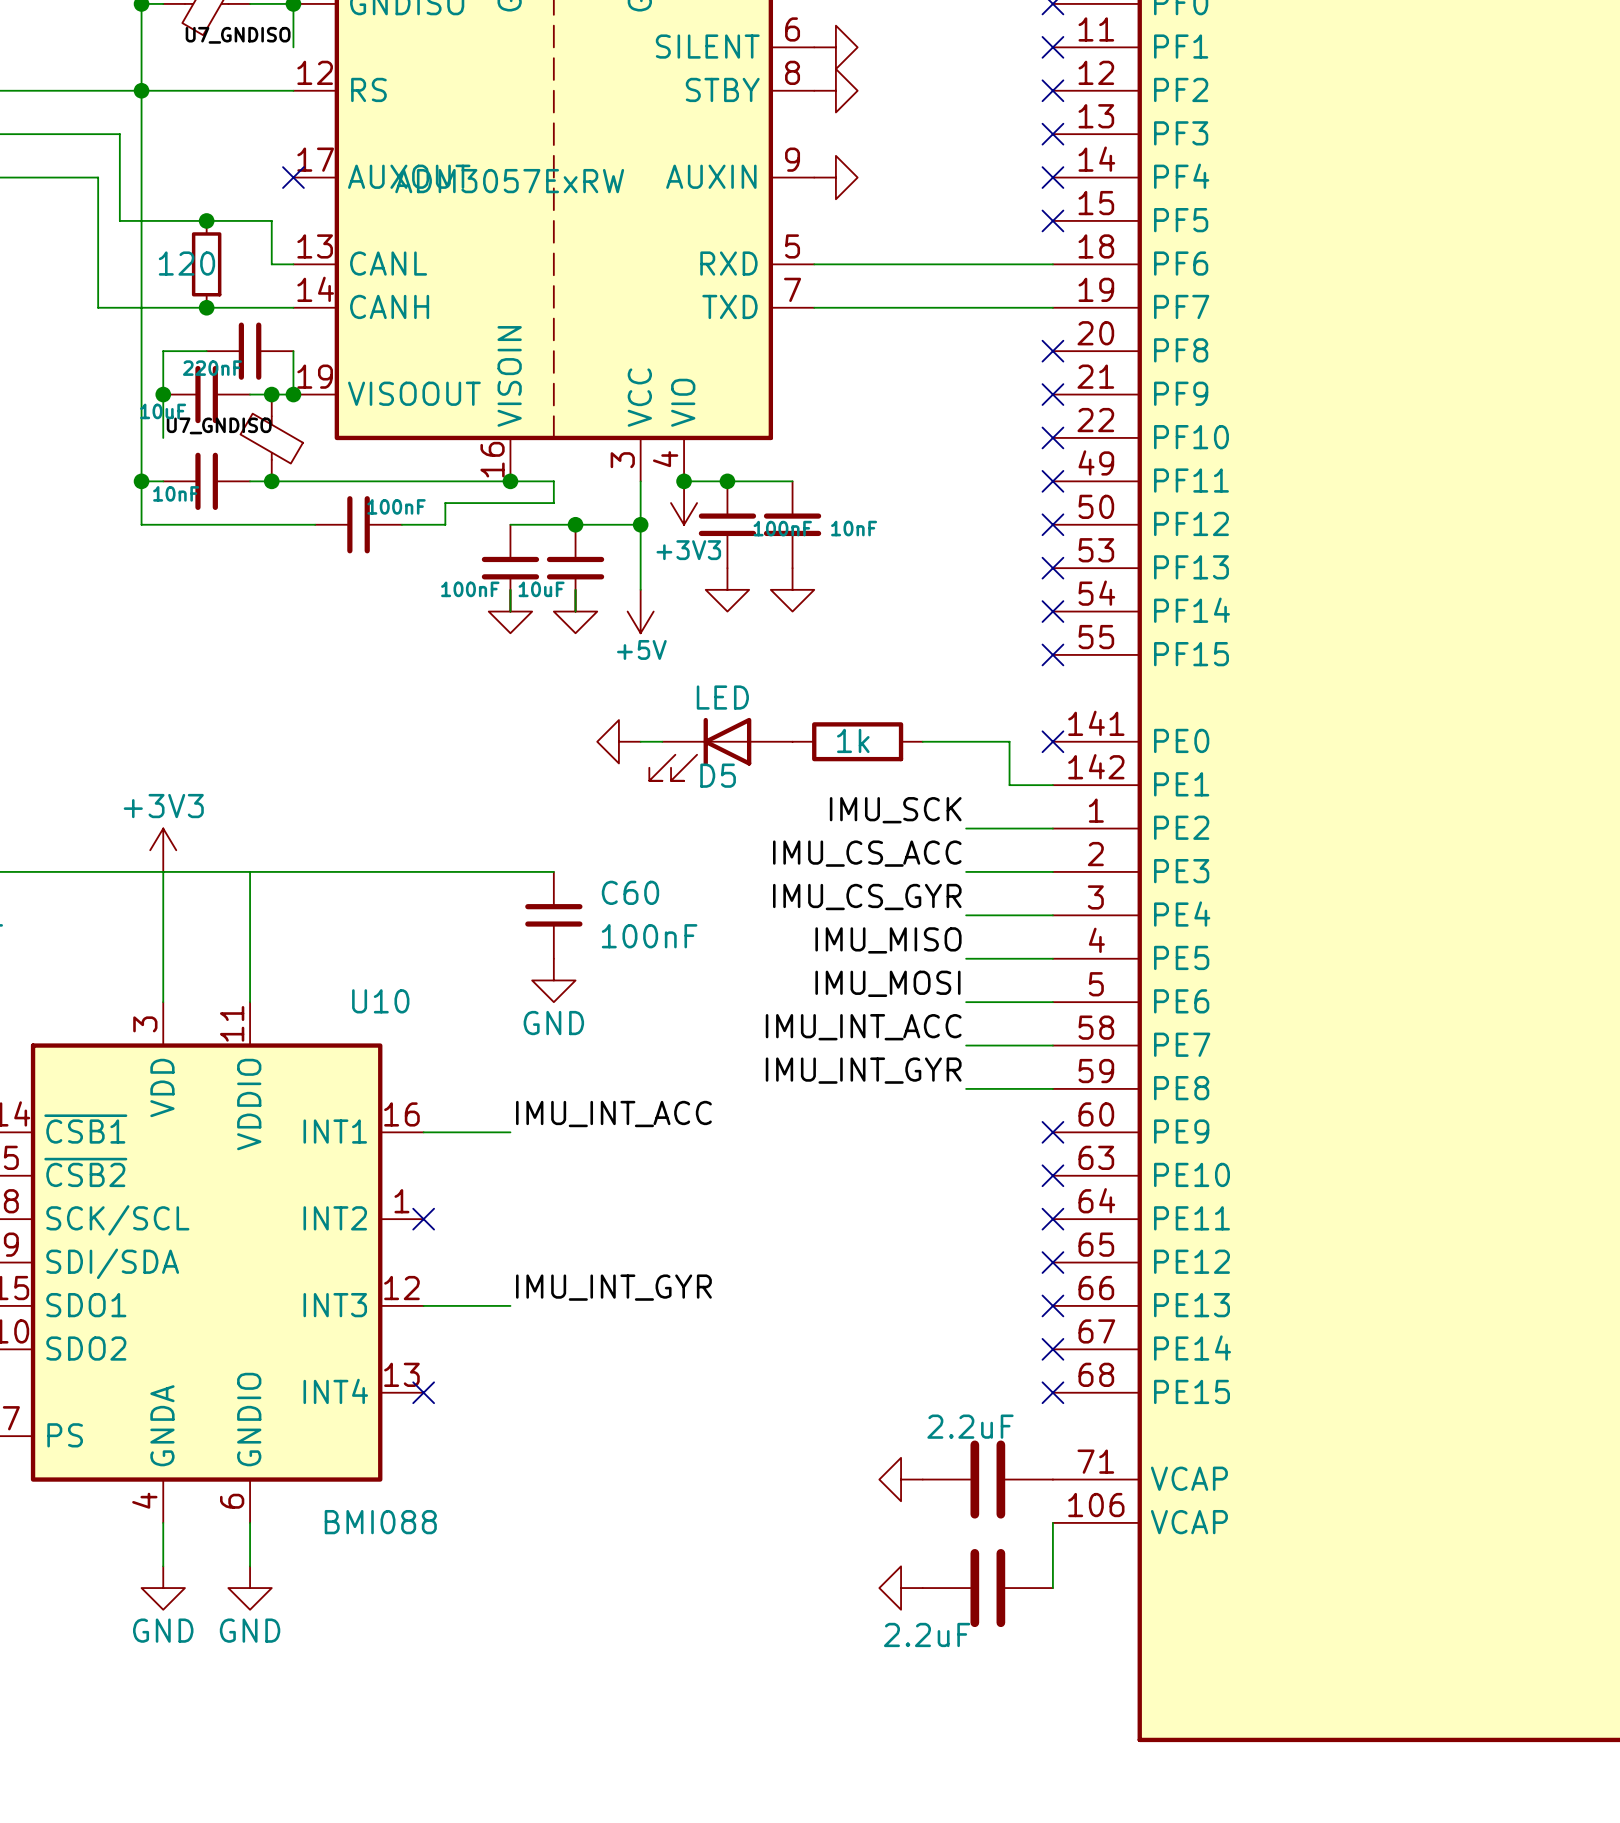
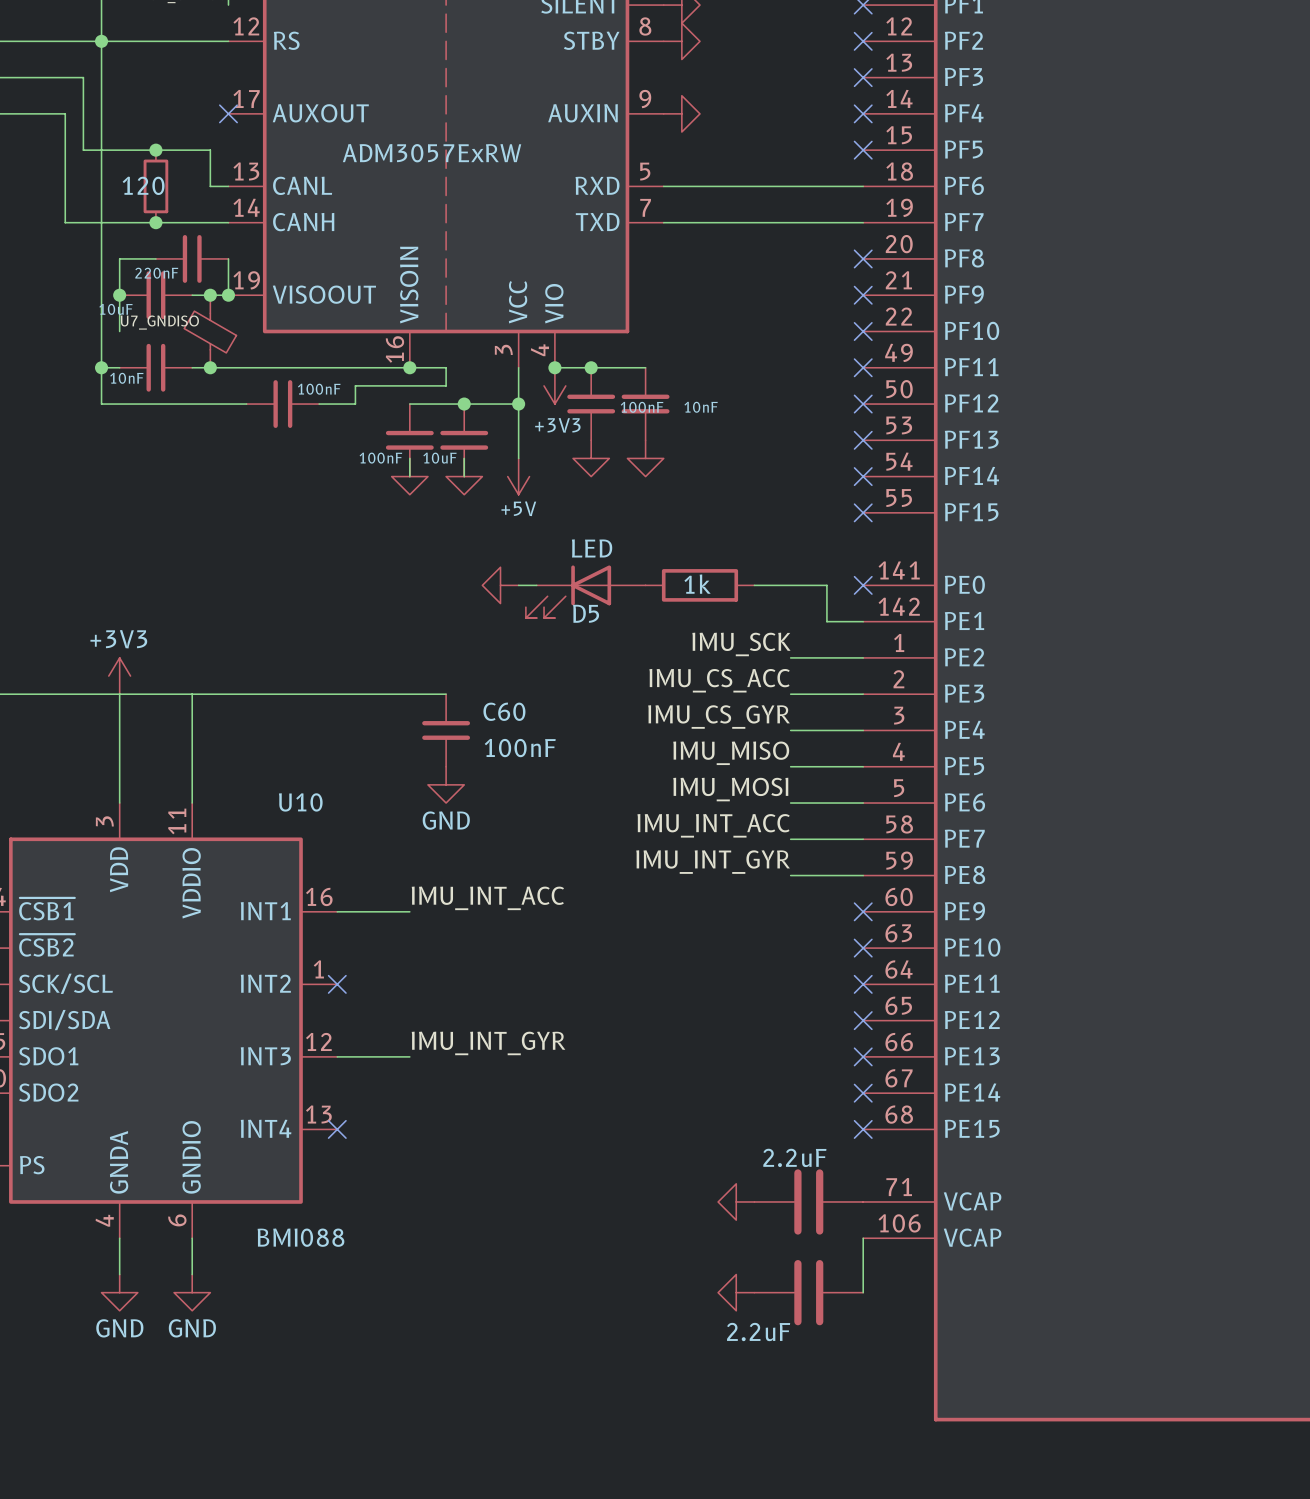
part value position: ADM3057ExRW (509, 181) -> ADM3057ExRW (432, 153)

